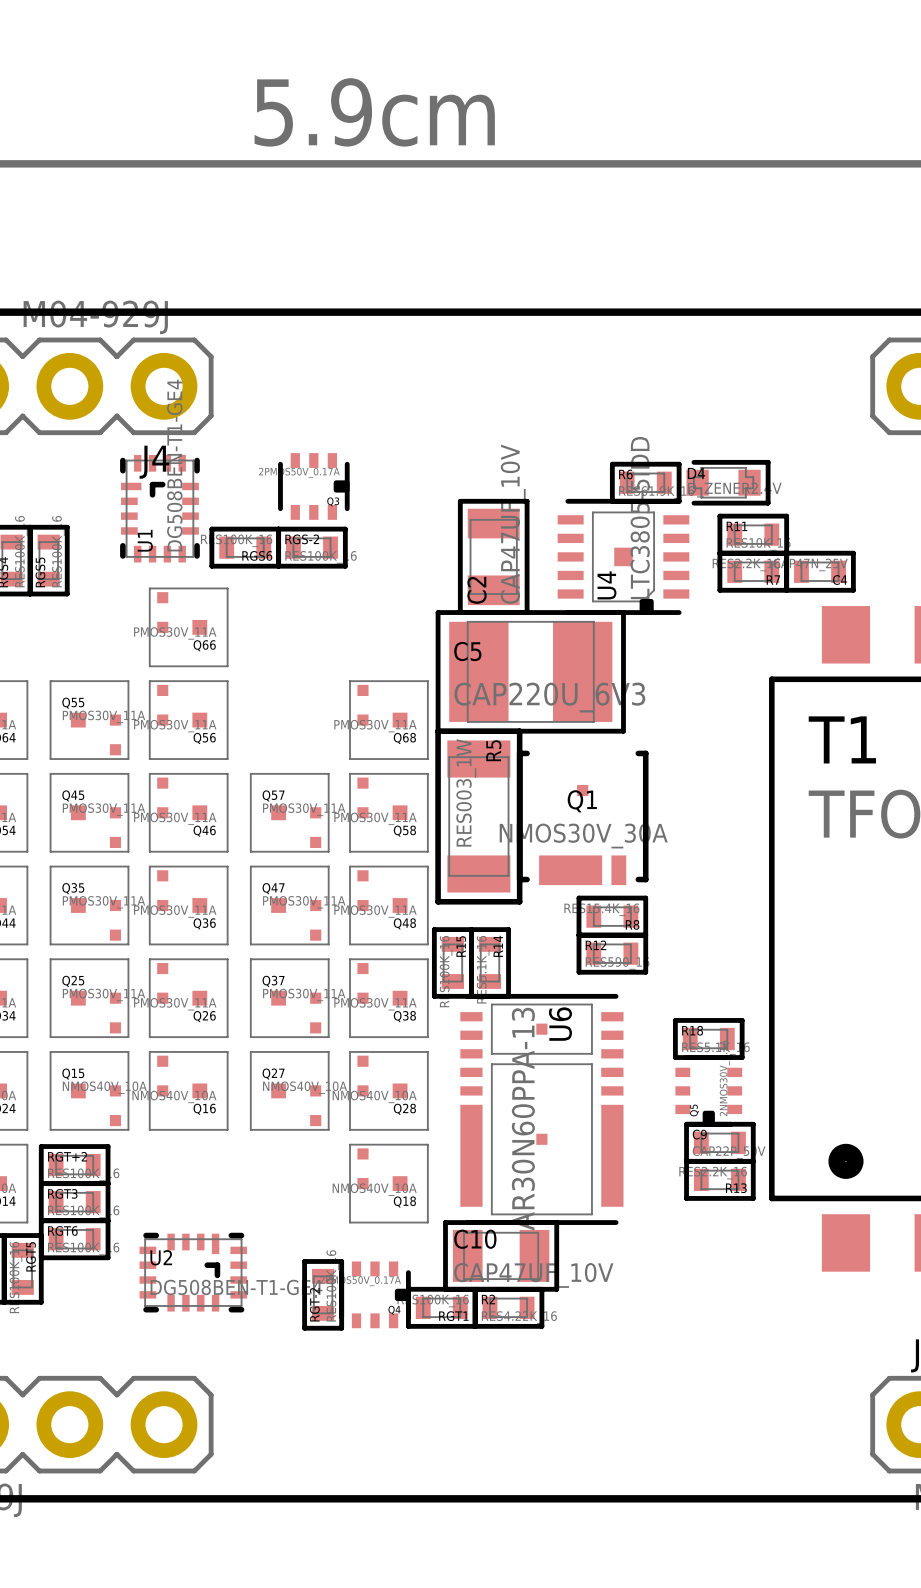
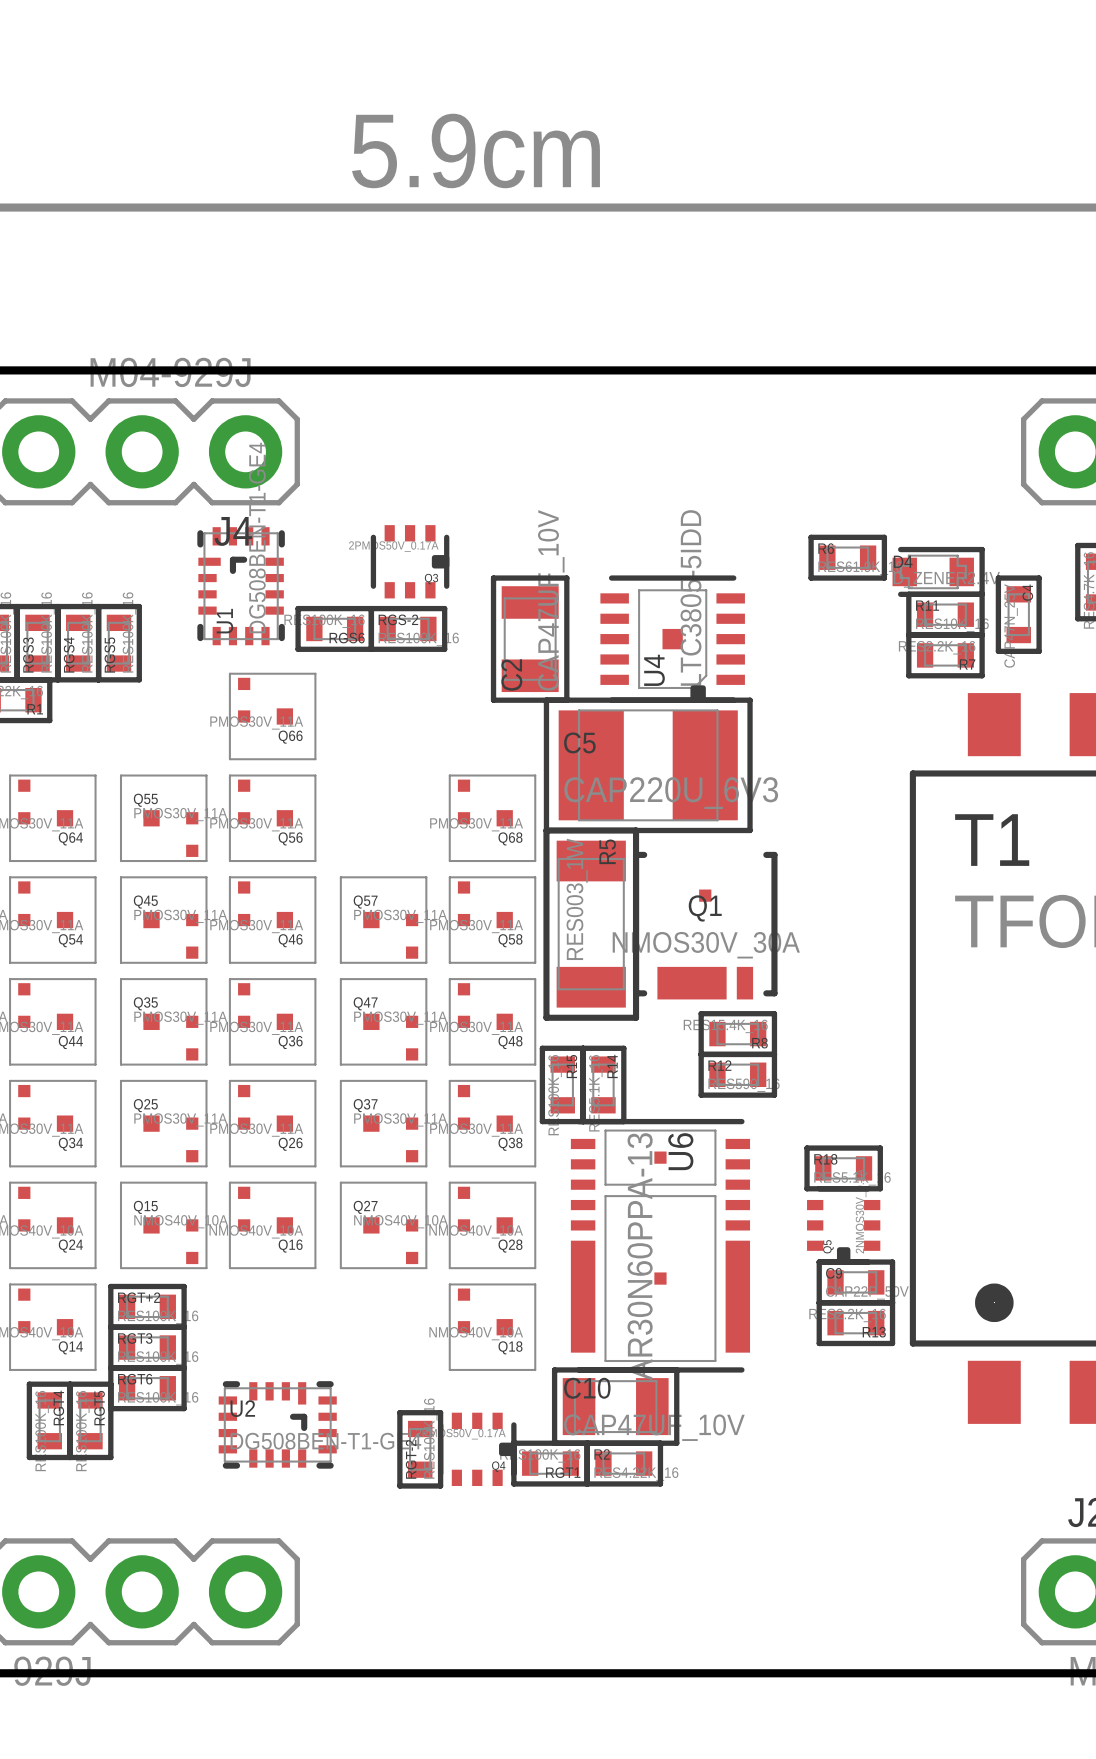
R6 position: (645, 482) -> (847, 557)
D4 position: (728, 482) -> (938, 571)
R11 position: (753, 534) -> (945, 614)
C2 position: (493, 556) -> (530, 639)
U4 position: (623, 556) -> (672, 639)
R7 position: (753, 571) -> (945, 655)
C4 rotation: 0° (820, 571) -> 90° clockwise (1018, 614)
C4 position: (820, 571) -> (1018, 614)

